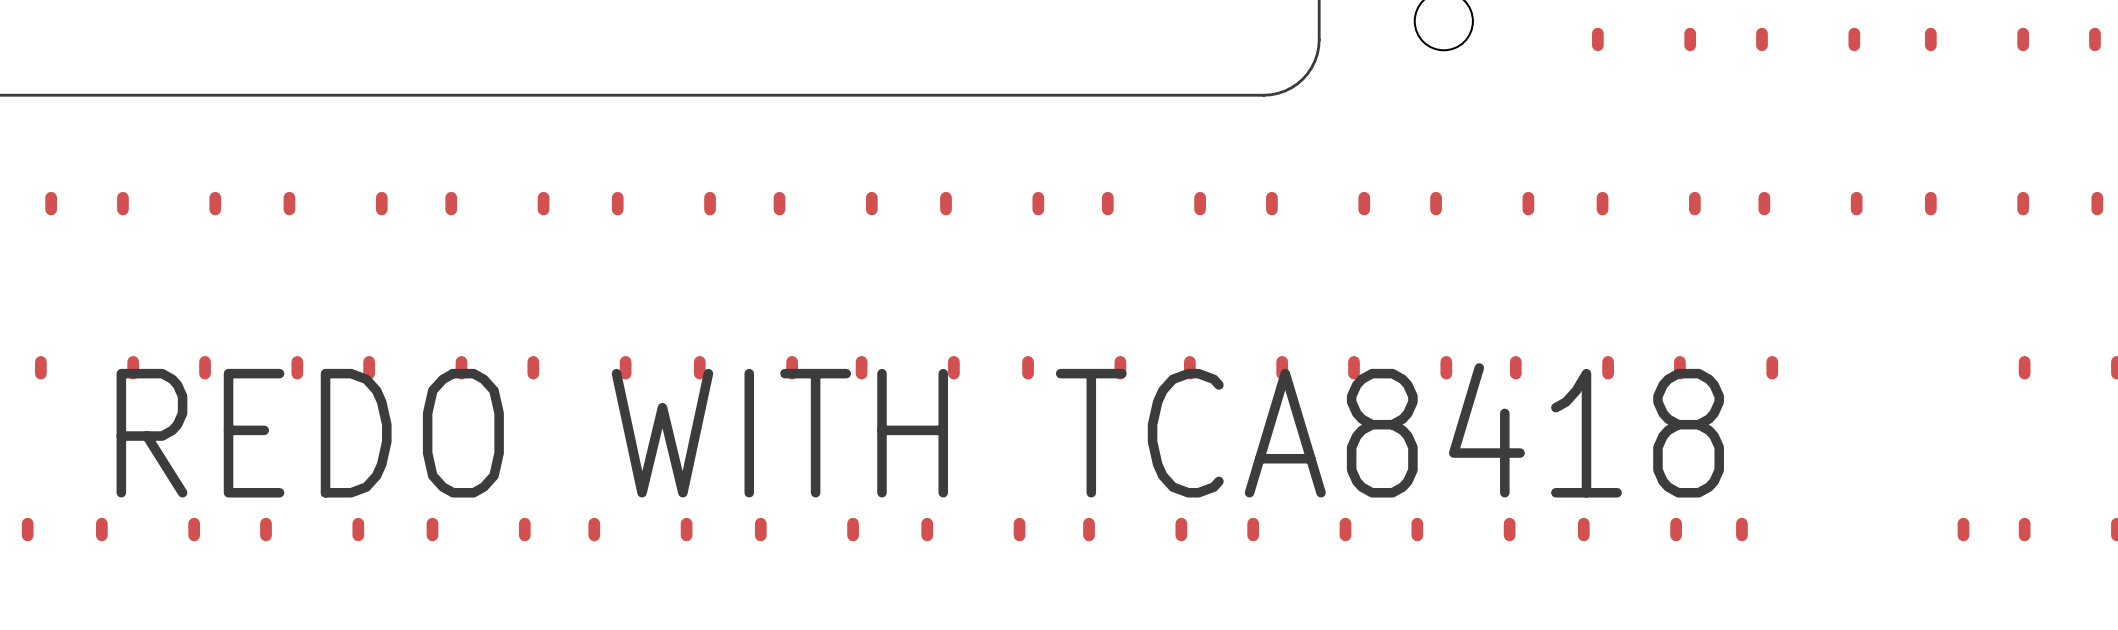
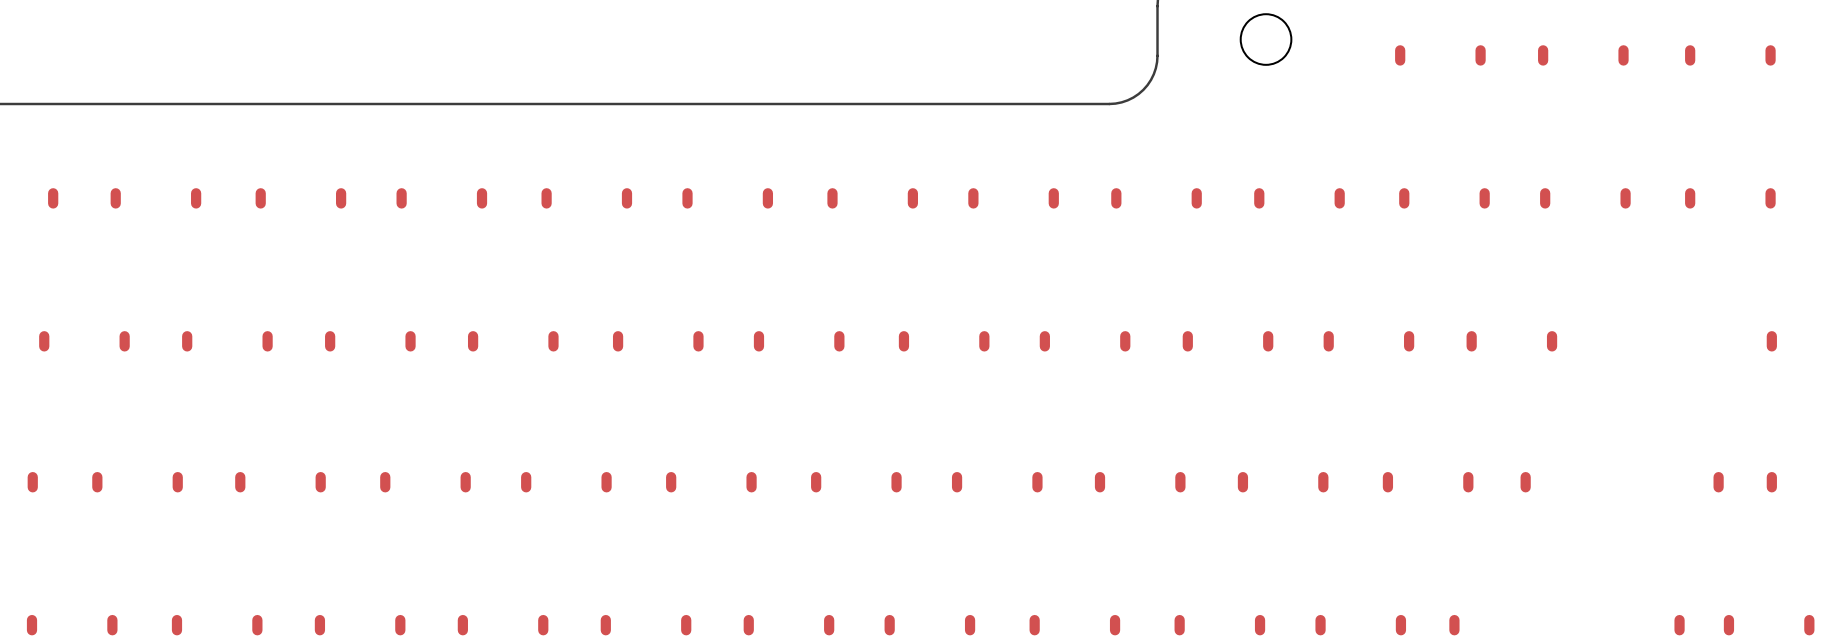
text: REDO WITH TCA8418 (920, 430) -> none

